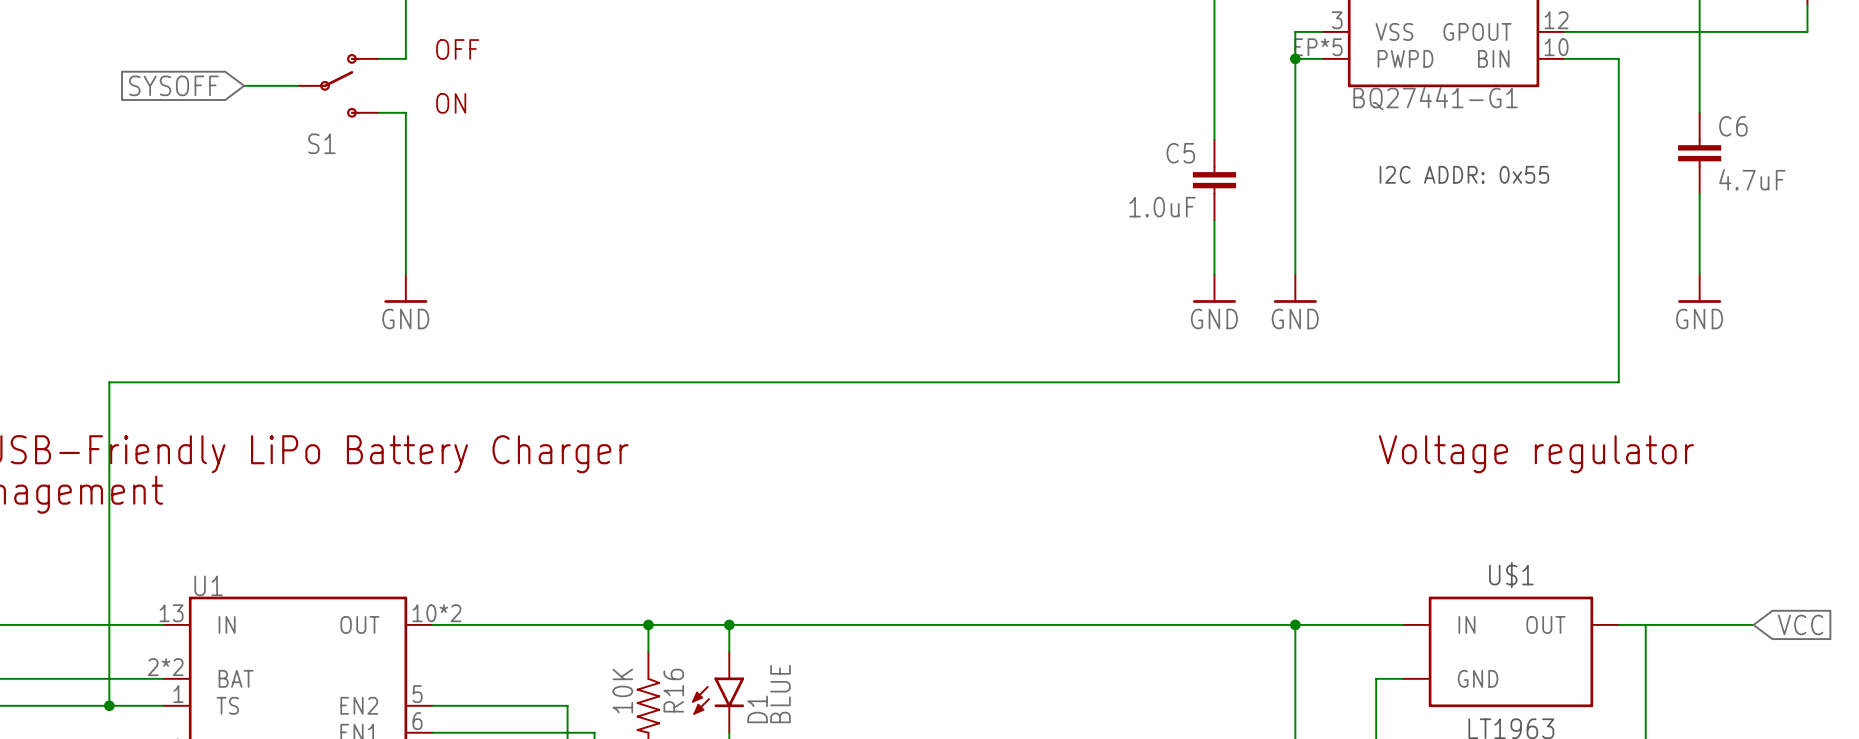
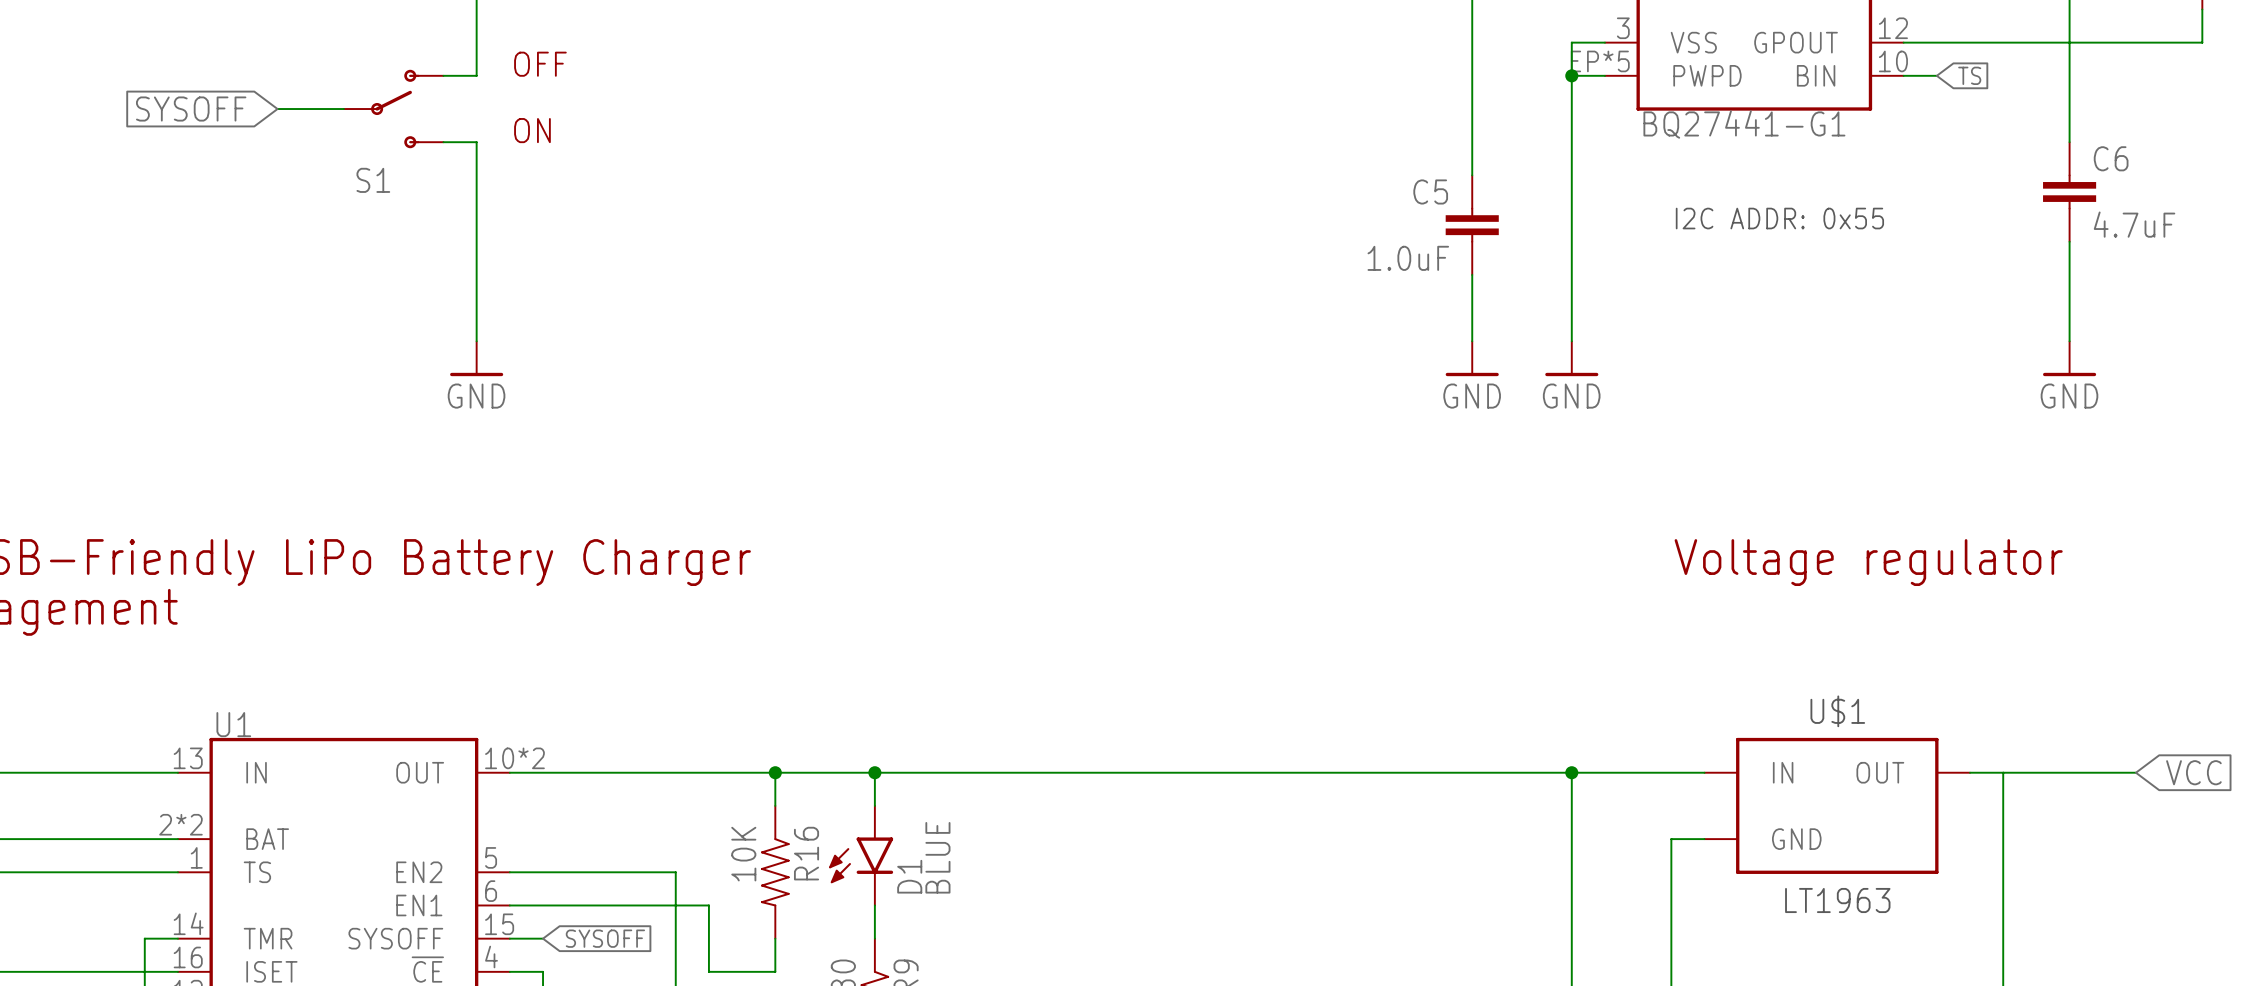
wire: (1591, 58) (1618, 58) (1618, 382) (109, 382) (109, 705) -> none
global label: none -> TS (1969, 75)
junction: (109, 705) -> none

